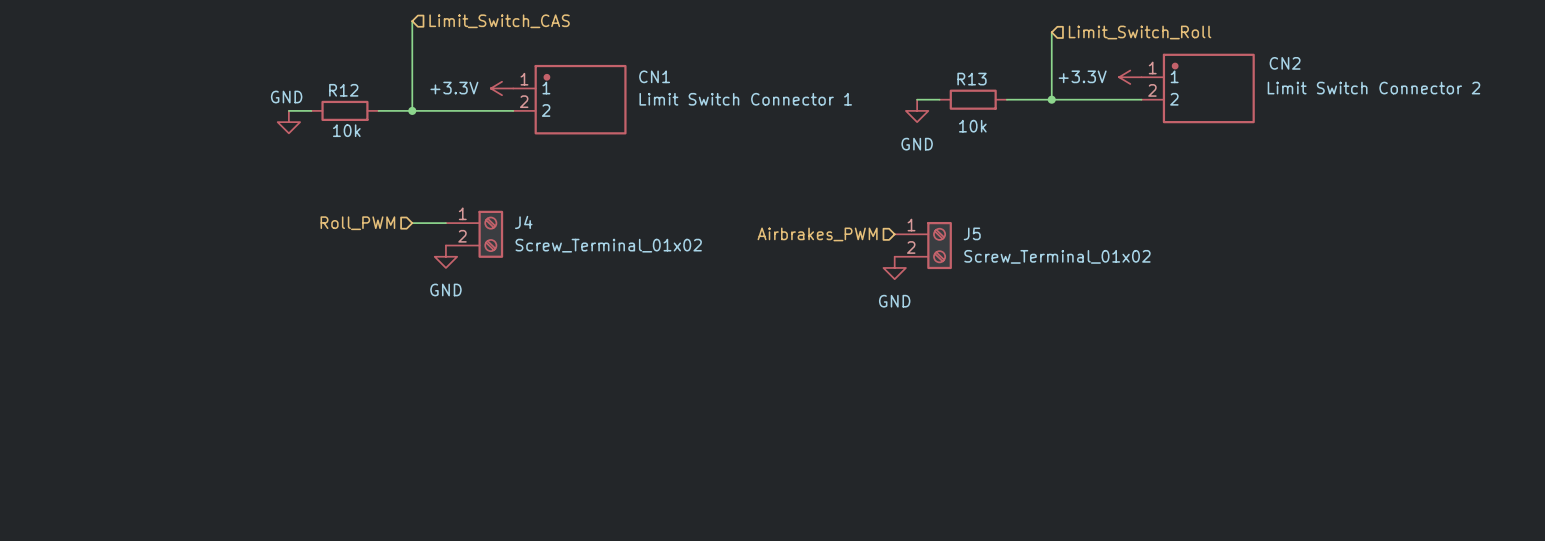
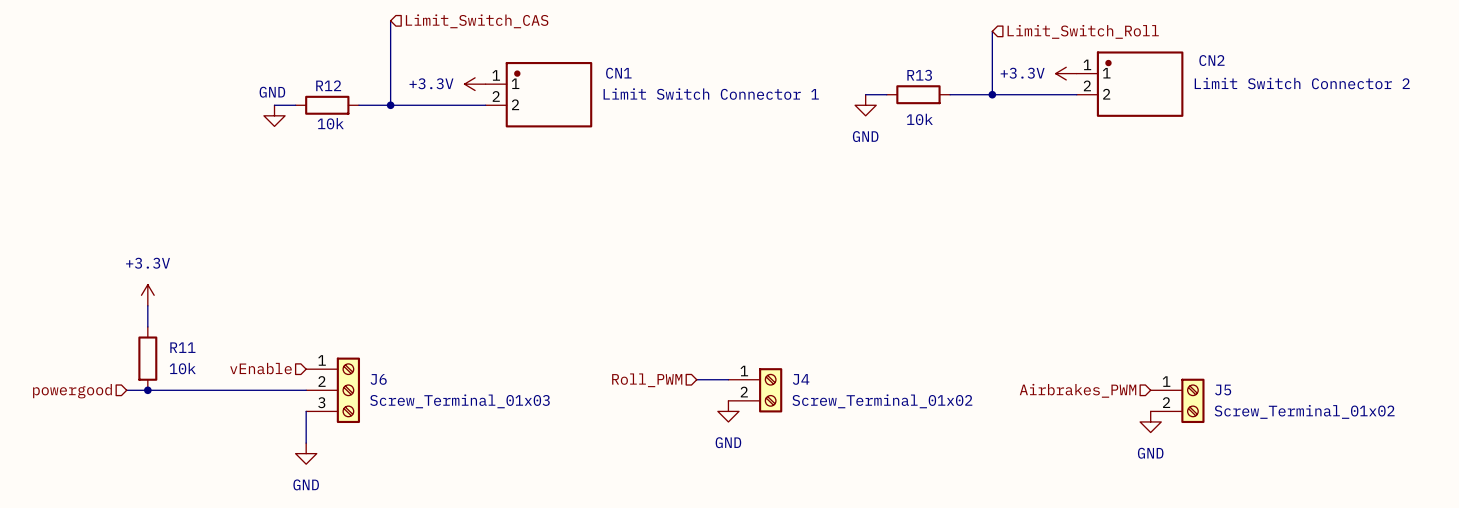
hierarchical label: Roll_PWM (357, 223) -> none
wire: (412, 223) (445, 223) -> none
J4 position: (474, 234) -> (755, 390)
hierarchical label: Airbrakes_PWM (817, 234) -> none
J5 position: (923, 245) -> (1177, 400)
power symbol: GND (445, 256) -> none
power symbol: GND (894, 267) -> none
power symbol: none -> +3.3V (147, 295)
wire: none -> (147, 305) (147, 326)
R11: none -> 10k (147, 358)
hierarchical label: none -> vEnable (260, 368)
hierarchical label: none -> Roll_PWM (647, 380)
wire: none -> (696, 379) (728, 379)
wire: none -> (126, 390) (306, 390)
junction: none -> (147, 390)
J6: none -> Screw_Terminal_01x03 (333, 390)
hierarchical label: none -> Airbrakes_PWM (1078, 390)
hierarchical label: none -> powergood (72, 391)
wire: none -> (306, 411) (306, 443)
power symbol: none -> GND (728, 411)
power symbol: none -> GND (1150, 421)
power symbol: none -> GND (306, 453)

